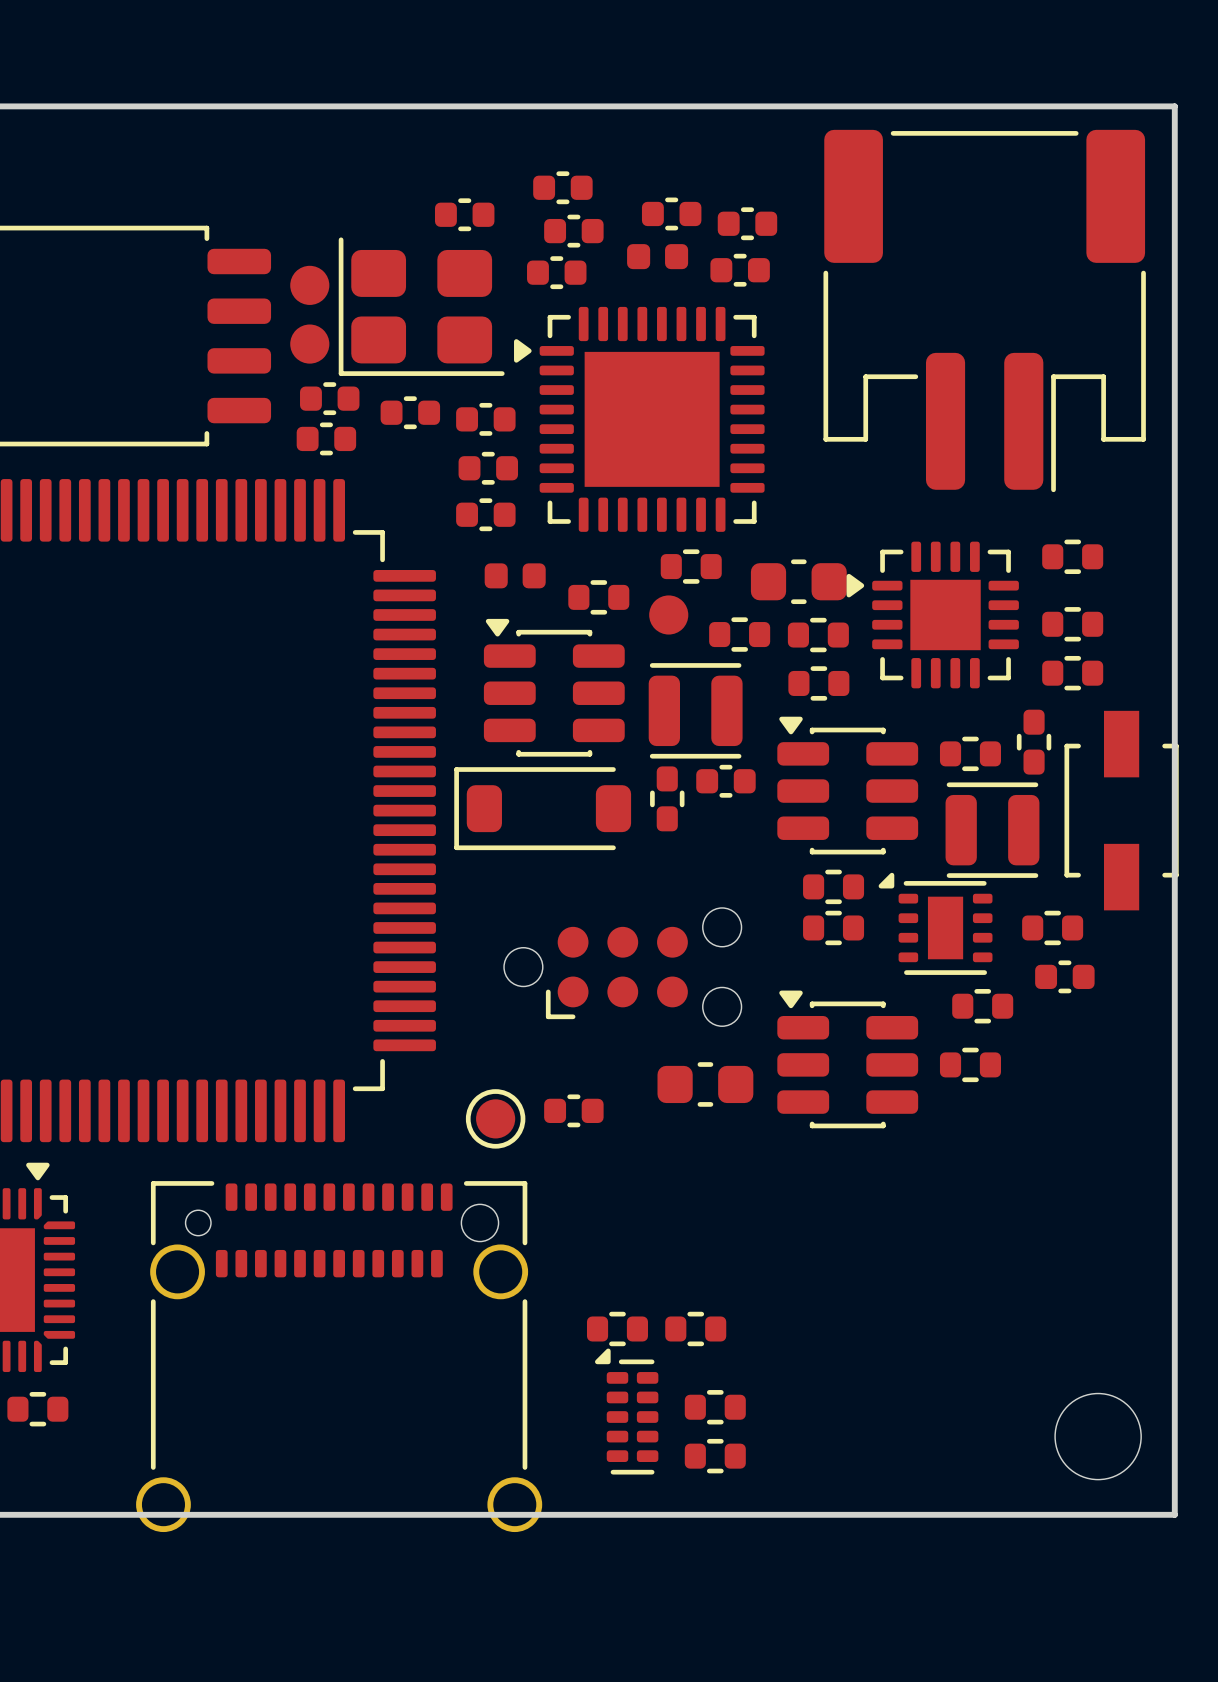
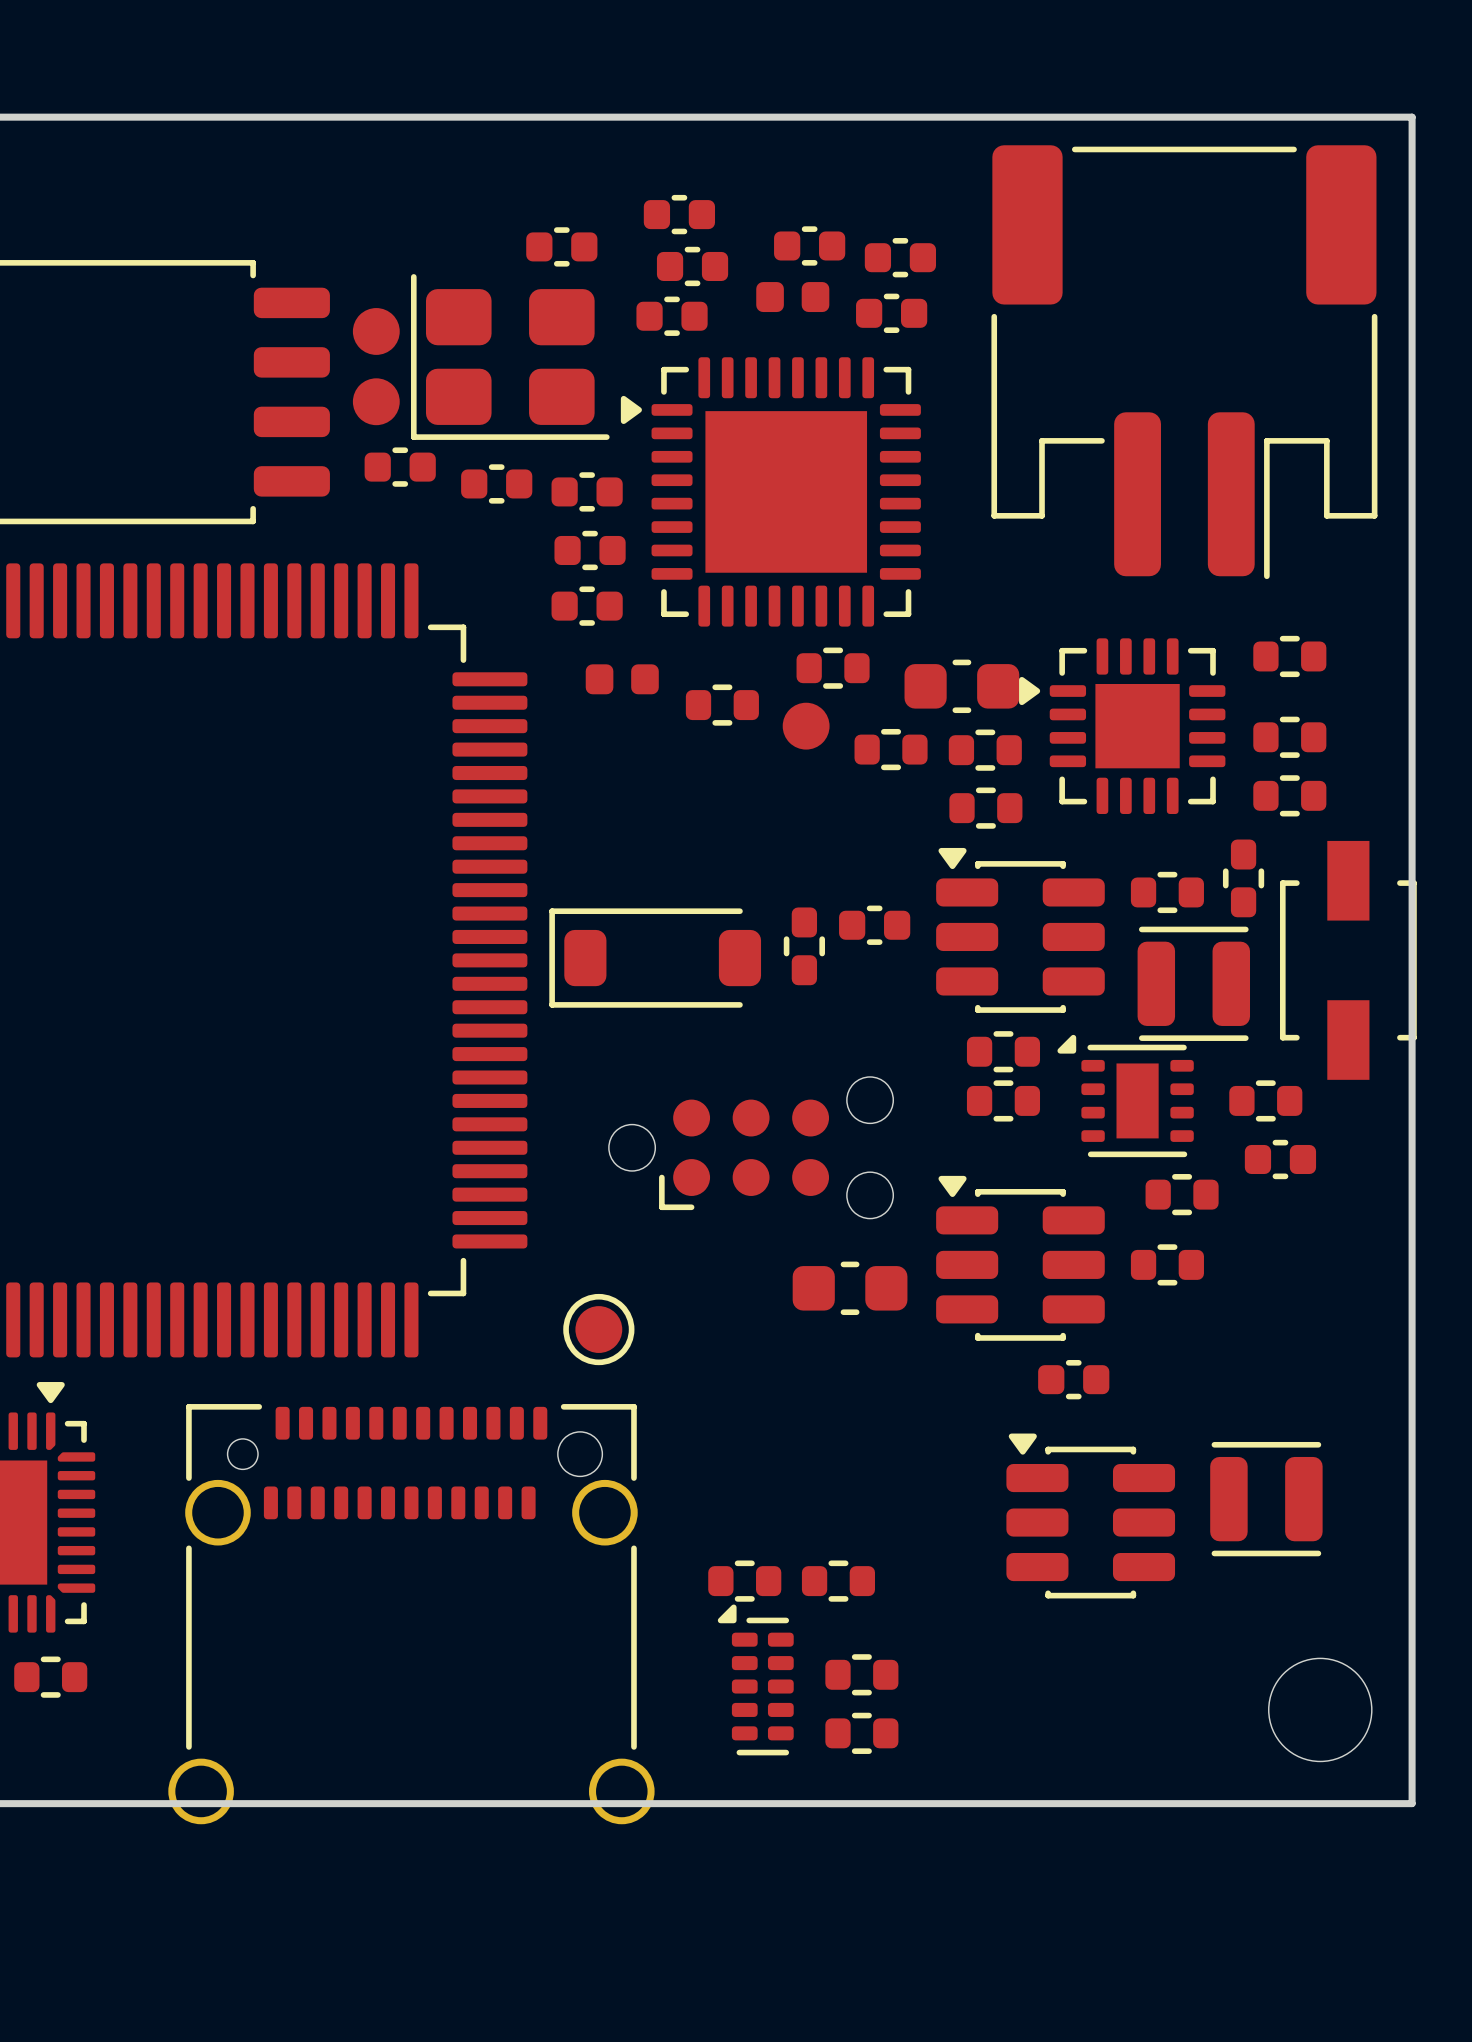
part: (326, 438) -> none
part position: (554, 687) -> (1090, 1515)
part position: (695, 710) -> (1266, 1499)
part position: (573, 1110) -> (1073, 1379)

